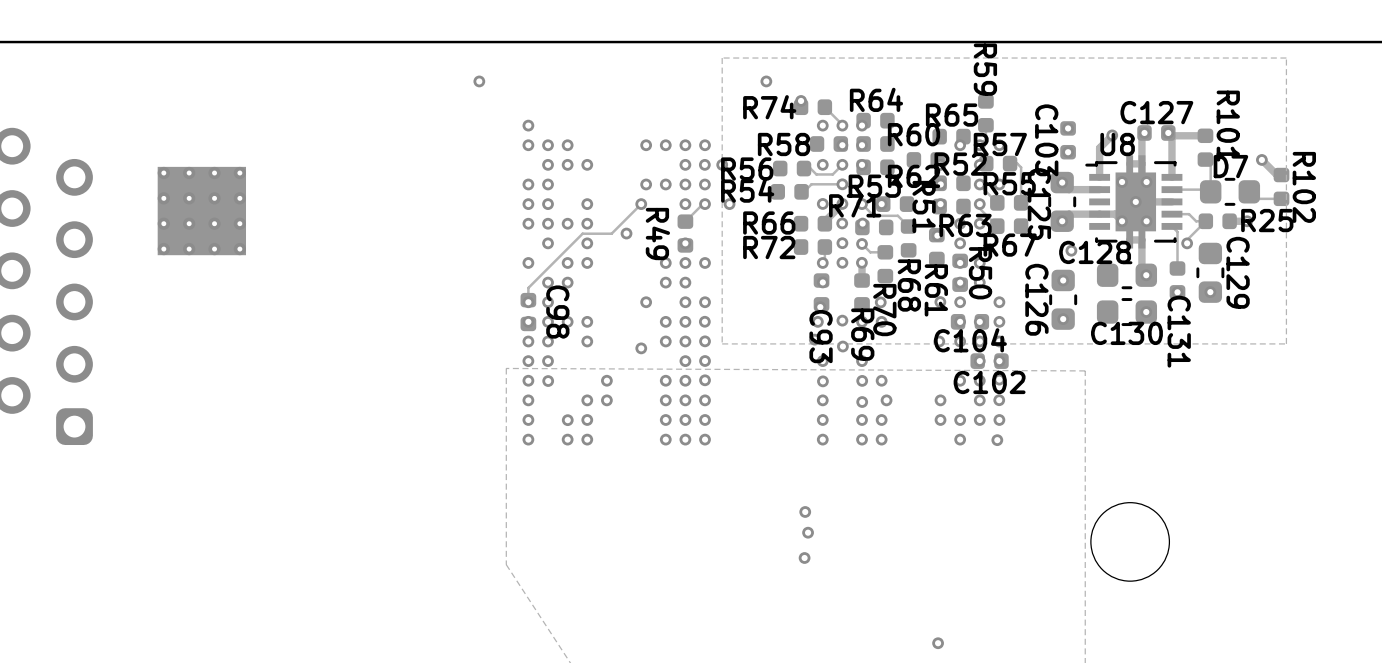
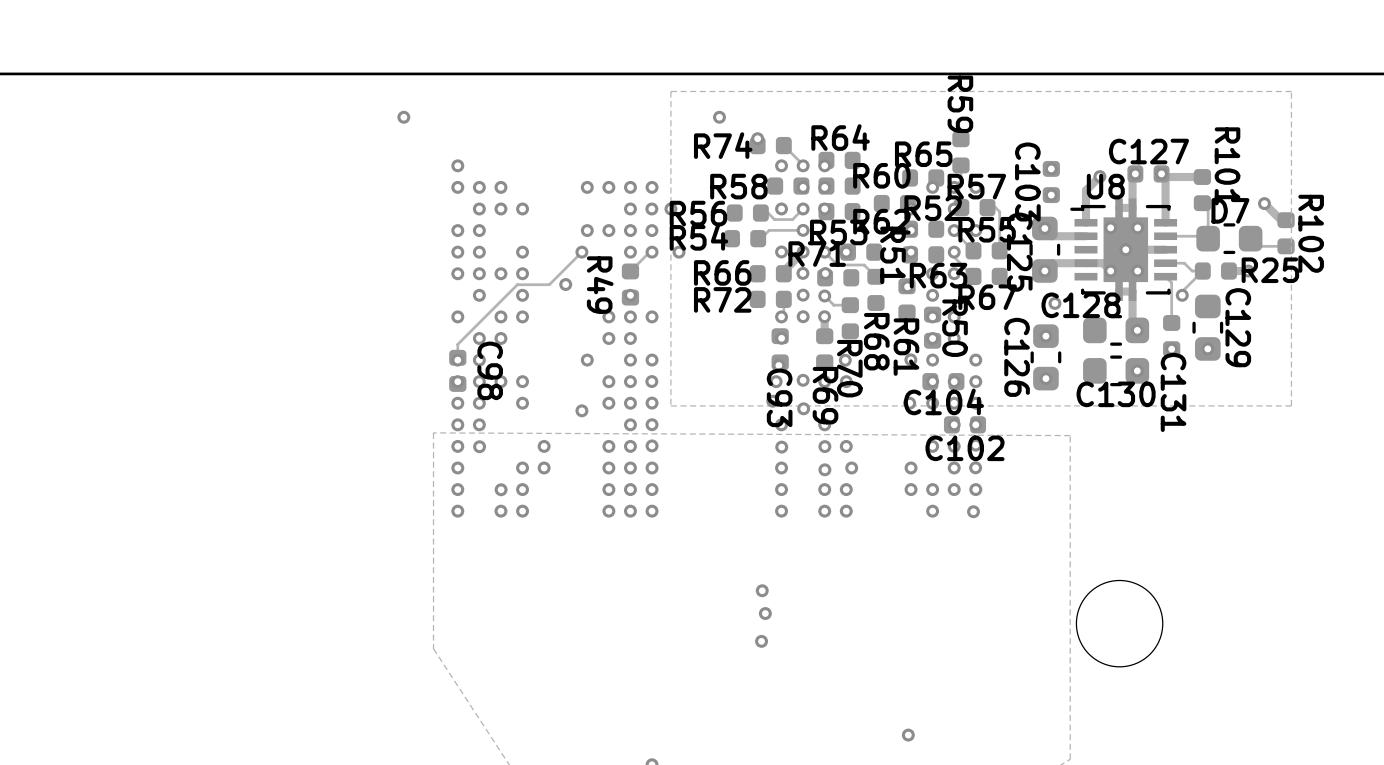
part: (201, 211) -> none

